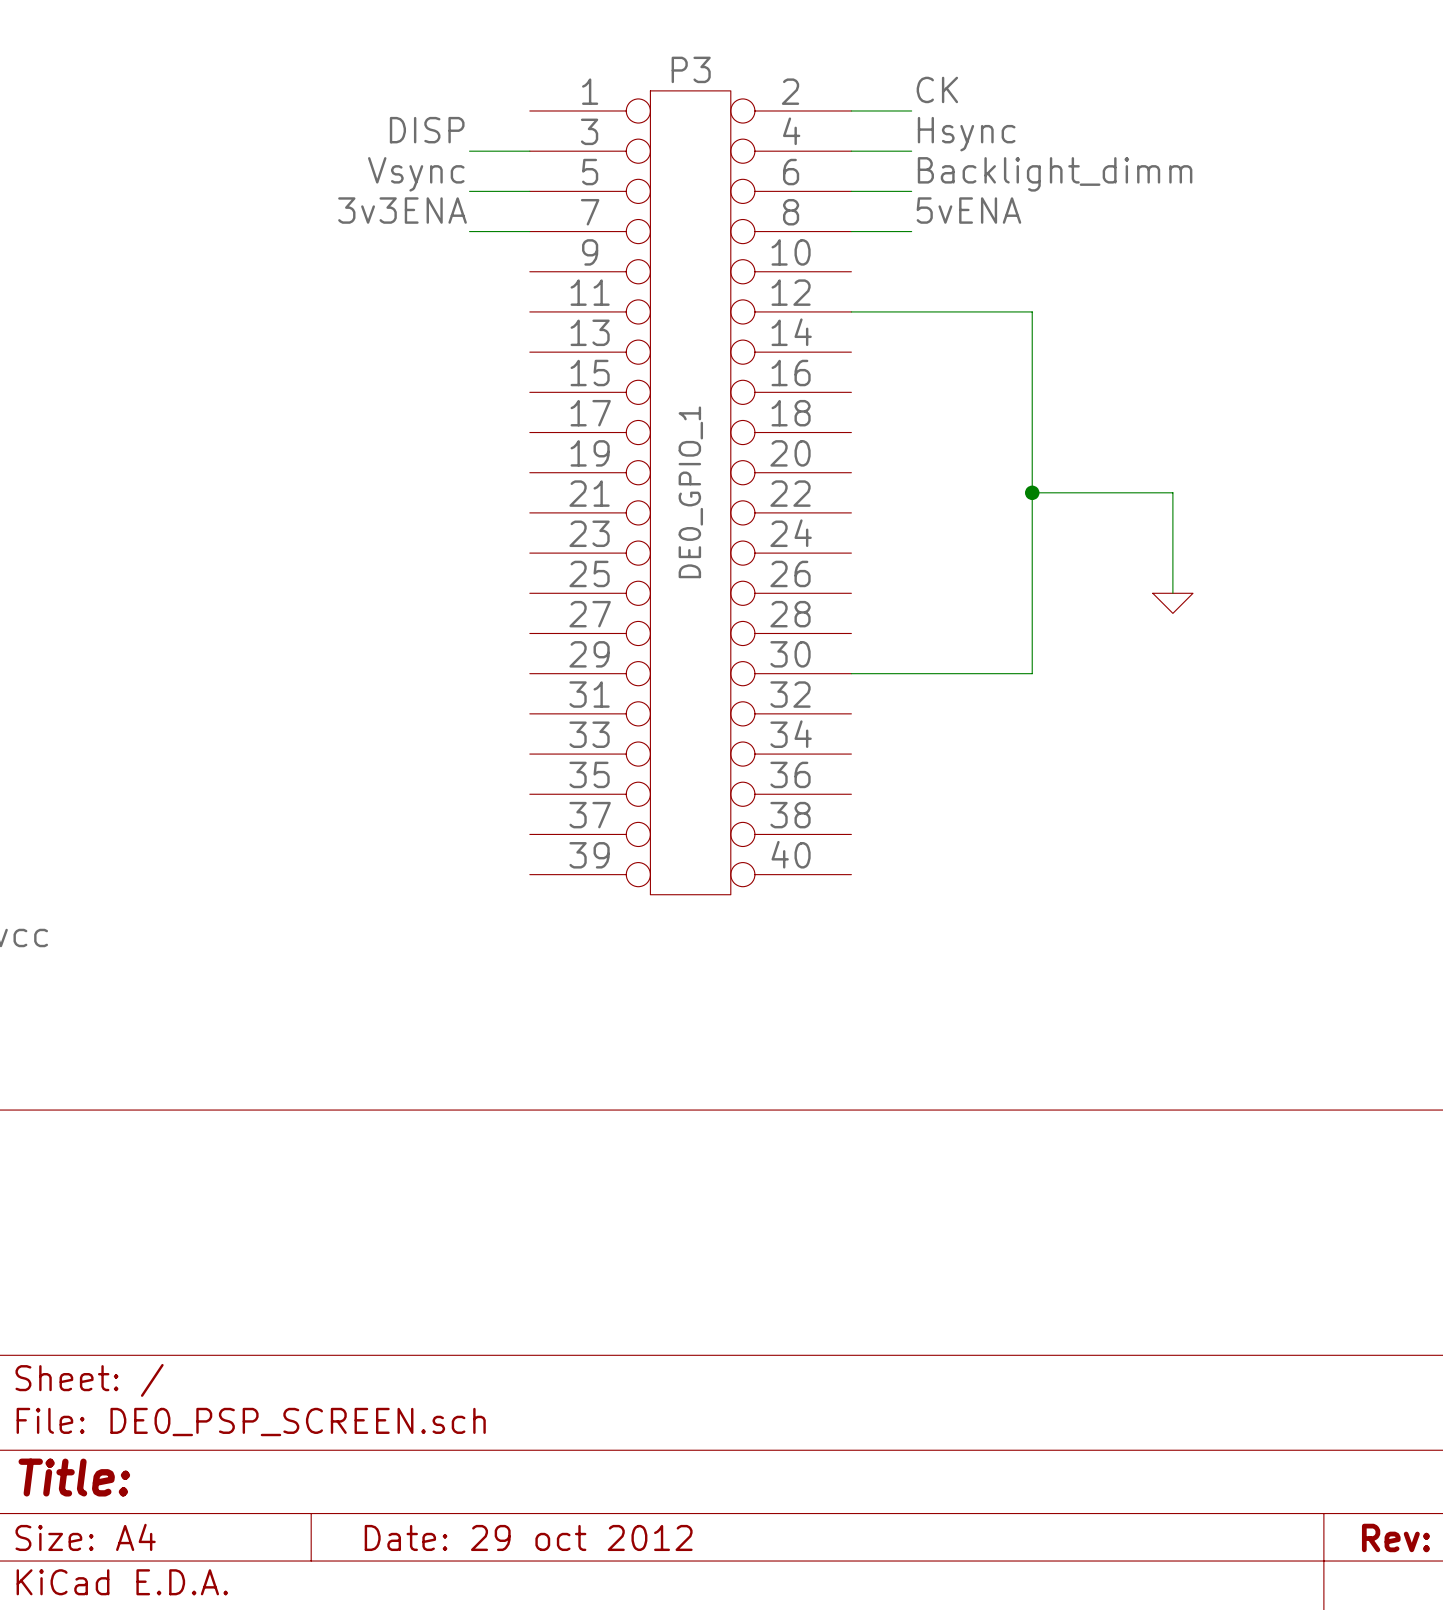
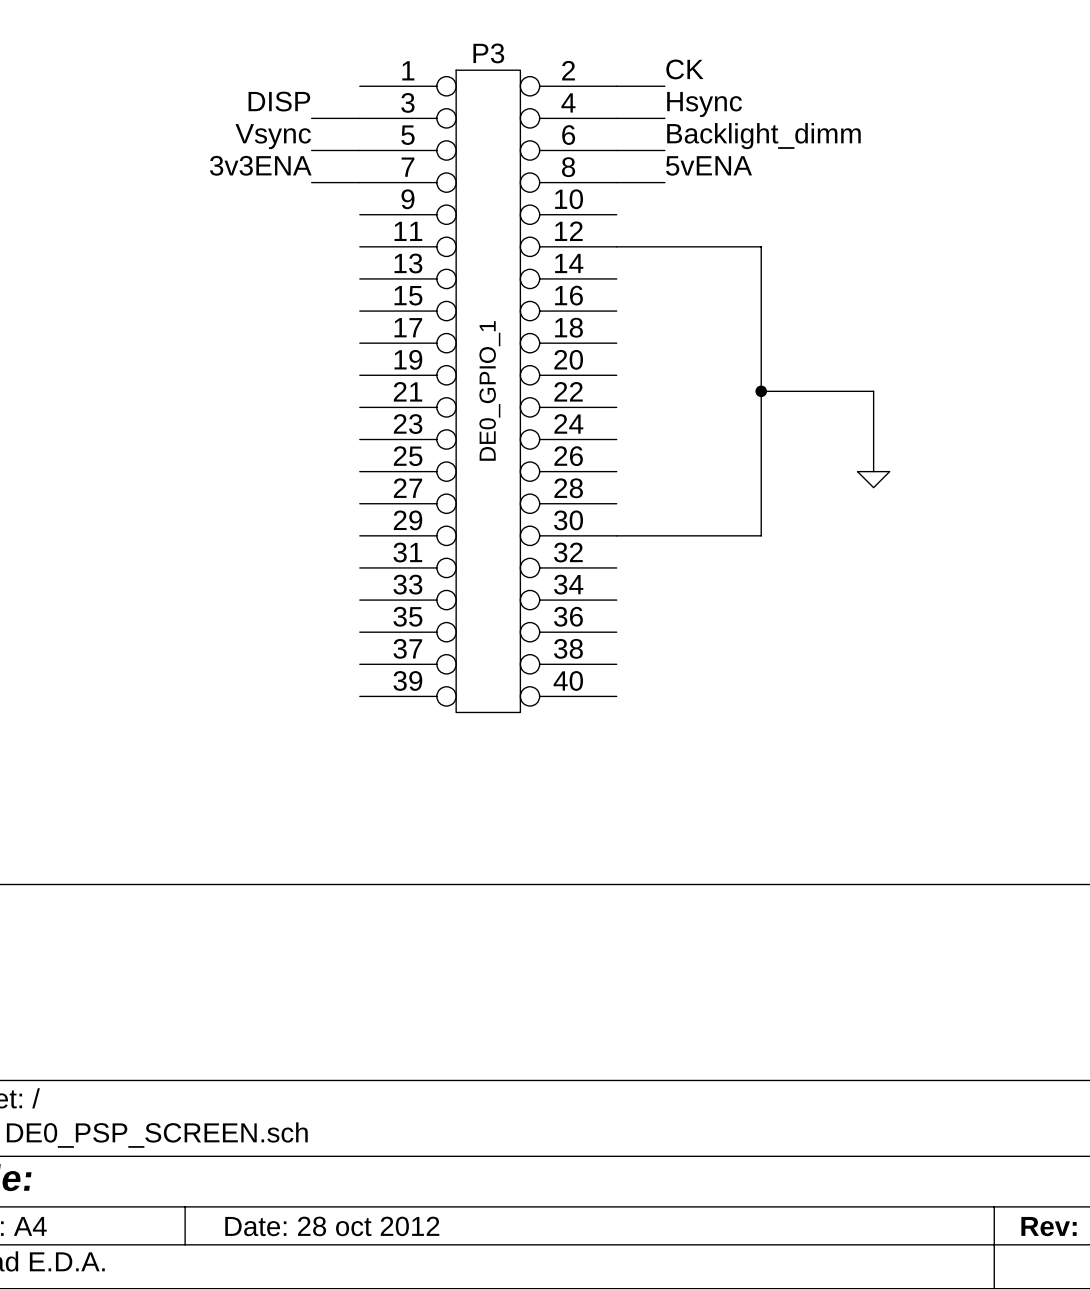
title block: Date: 29 oct 2012 (528, 1537) -> Date: 28 oct 2012 (332, 1226)

